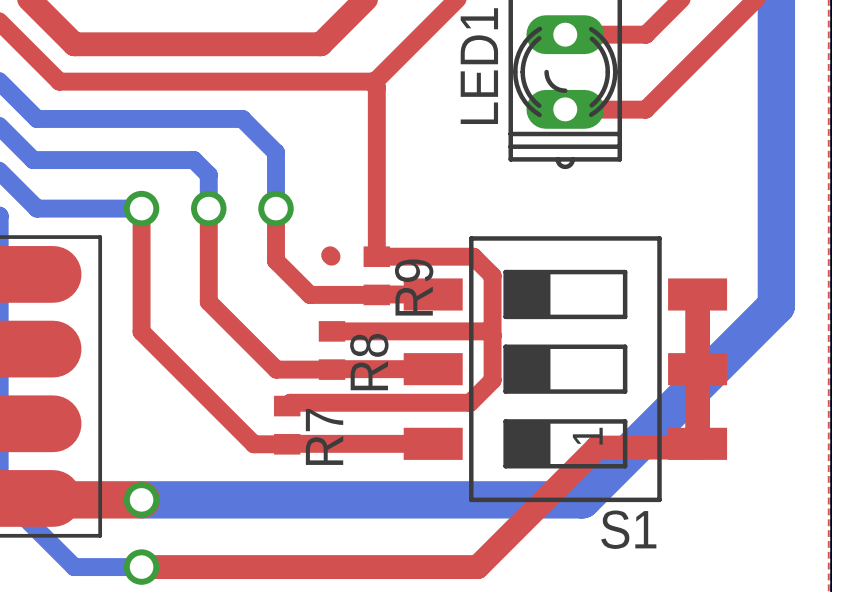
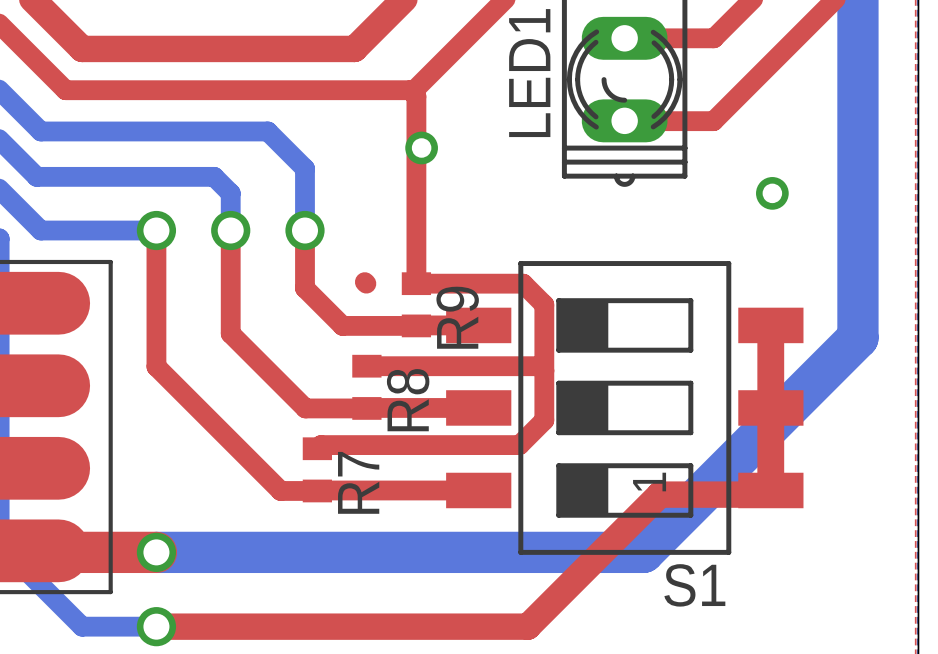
via: none -> (421, 147)
via: none -> (772, 193)

